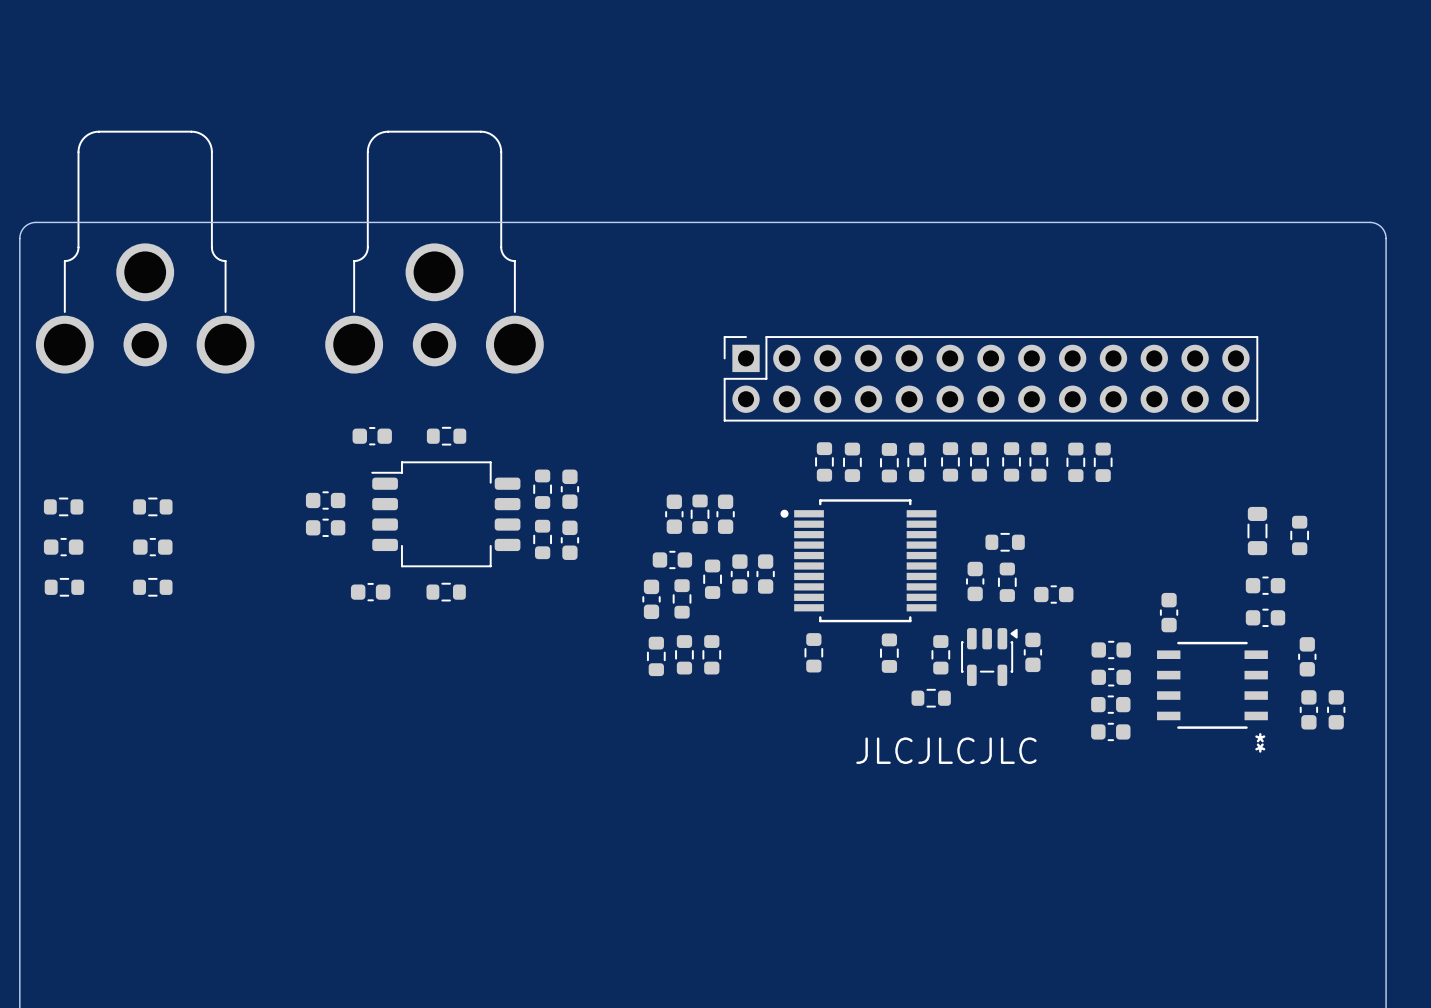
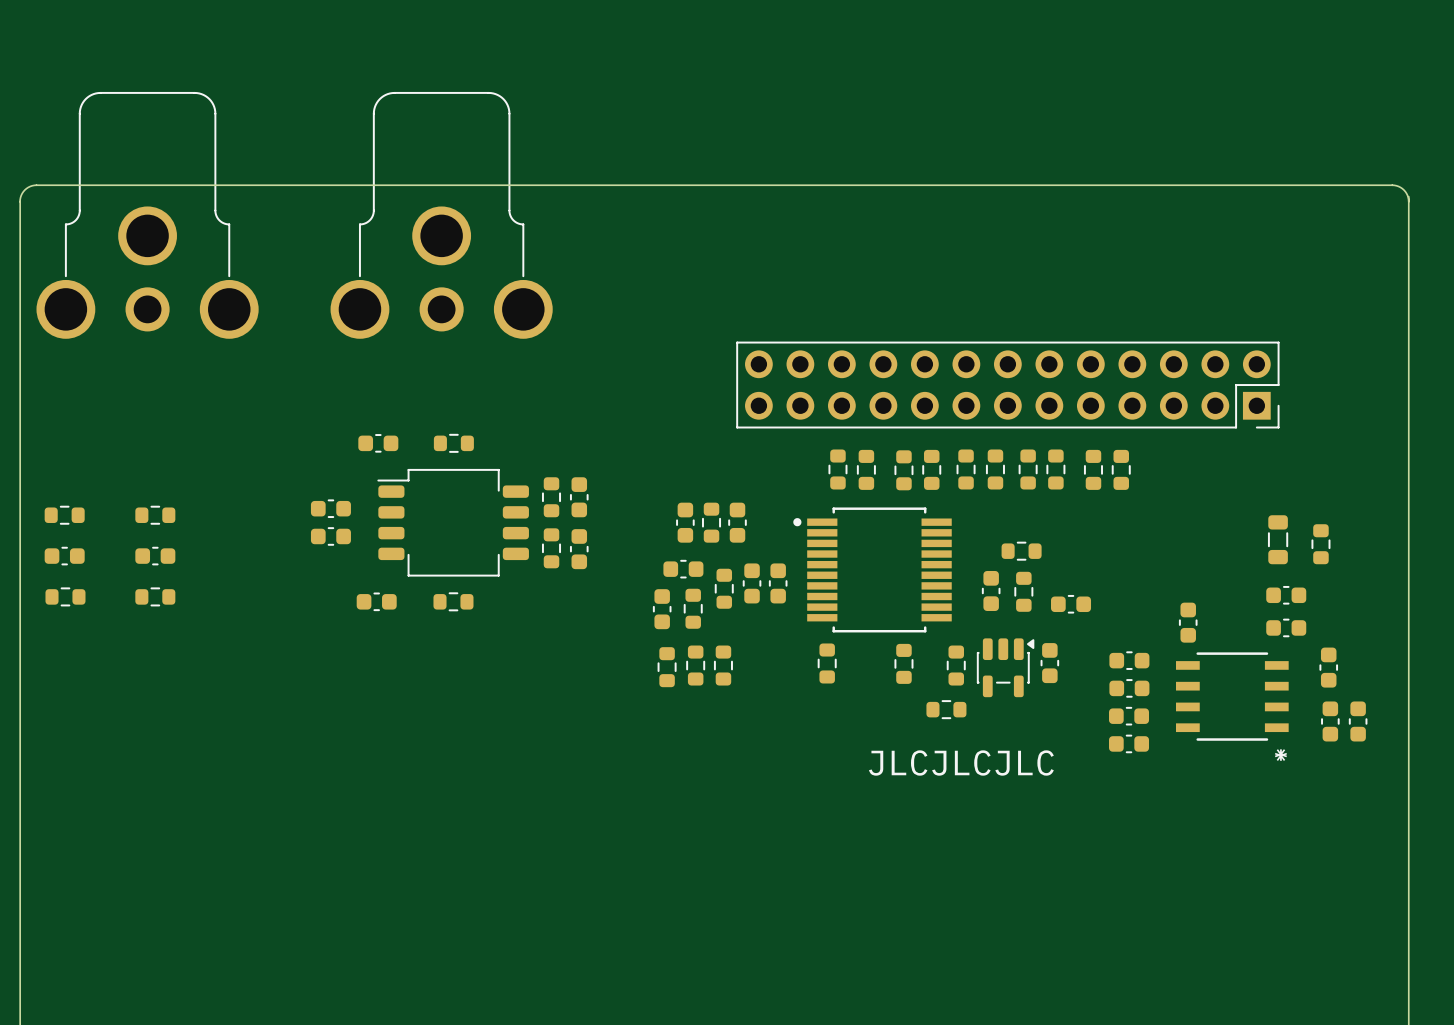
board edge: none -> (1392, 185) (36, 185) (24, 190) (20, 201)
board edge: none -> (1392, 185) (1403, 190) (1408, 201)
board edge: none -> (1408, 196) (1408, 242)
board edge: (1386, 238) (1381, 227) (1369, 222) (35, 222) (24, 227) (19, 238) -> (20, 201) (20, 242)
part position: (145, 252) -> (147, 215)
part position: (434, 252) -> (441, 215)
part rotation: 0° (990, 378) -> 180° (1007, 385)

